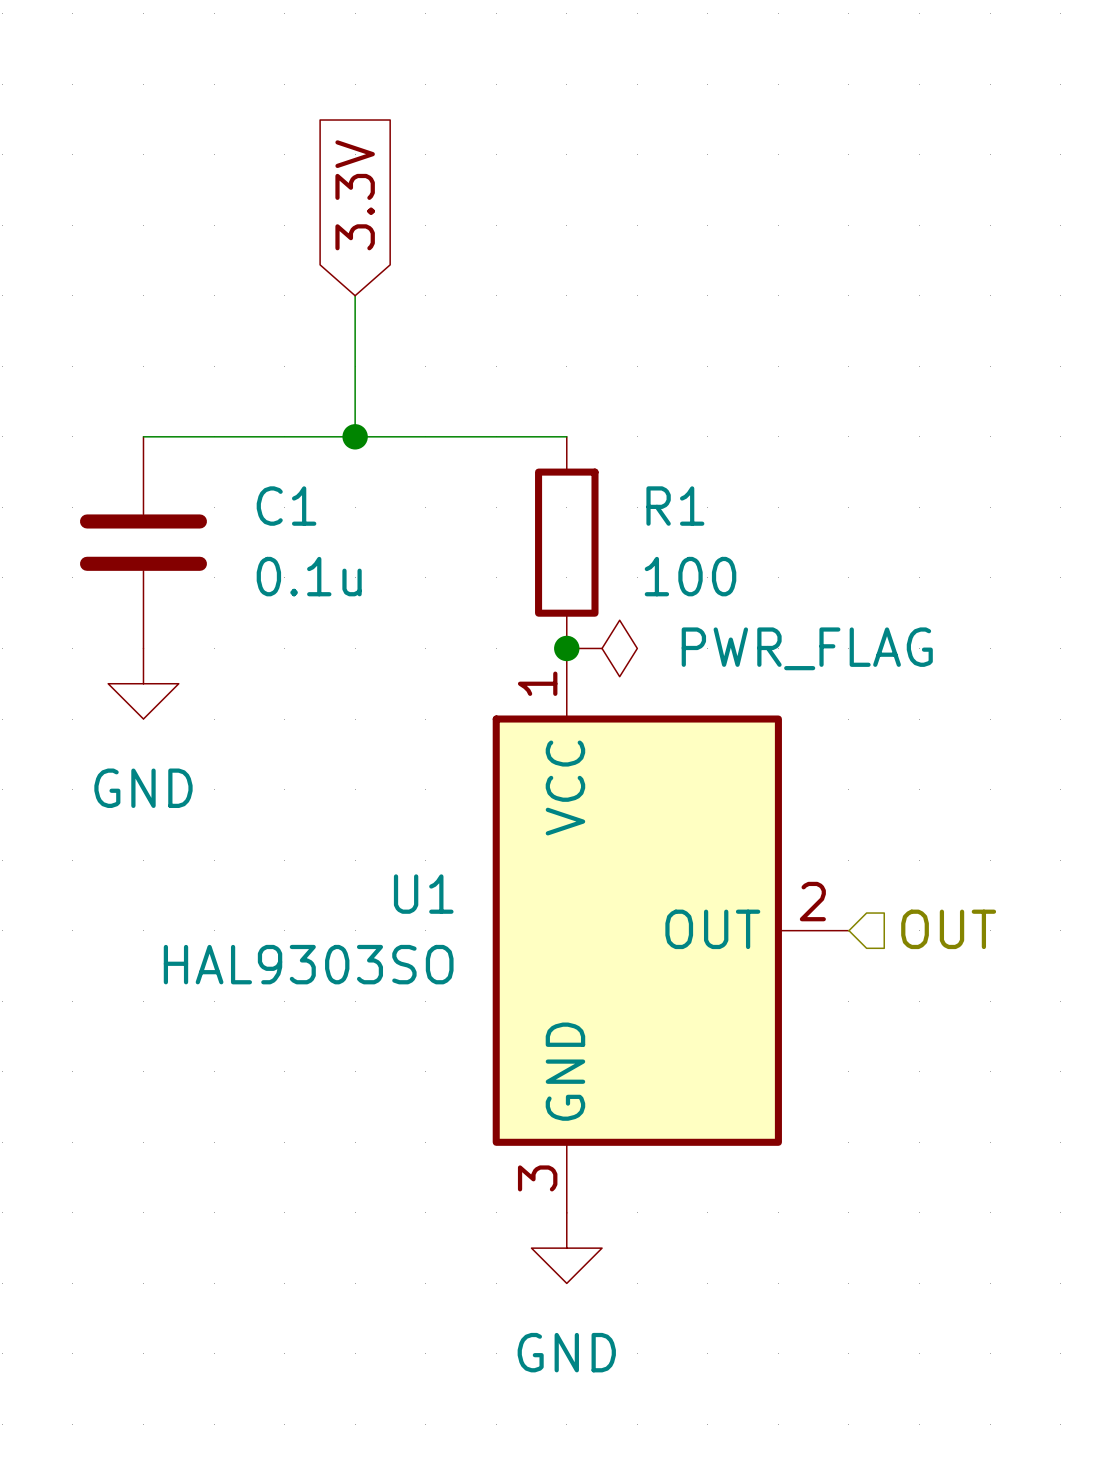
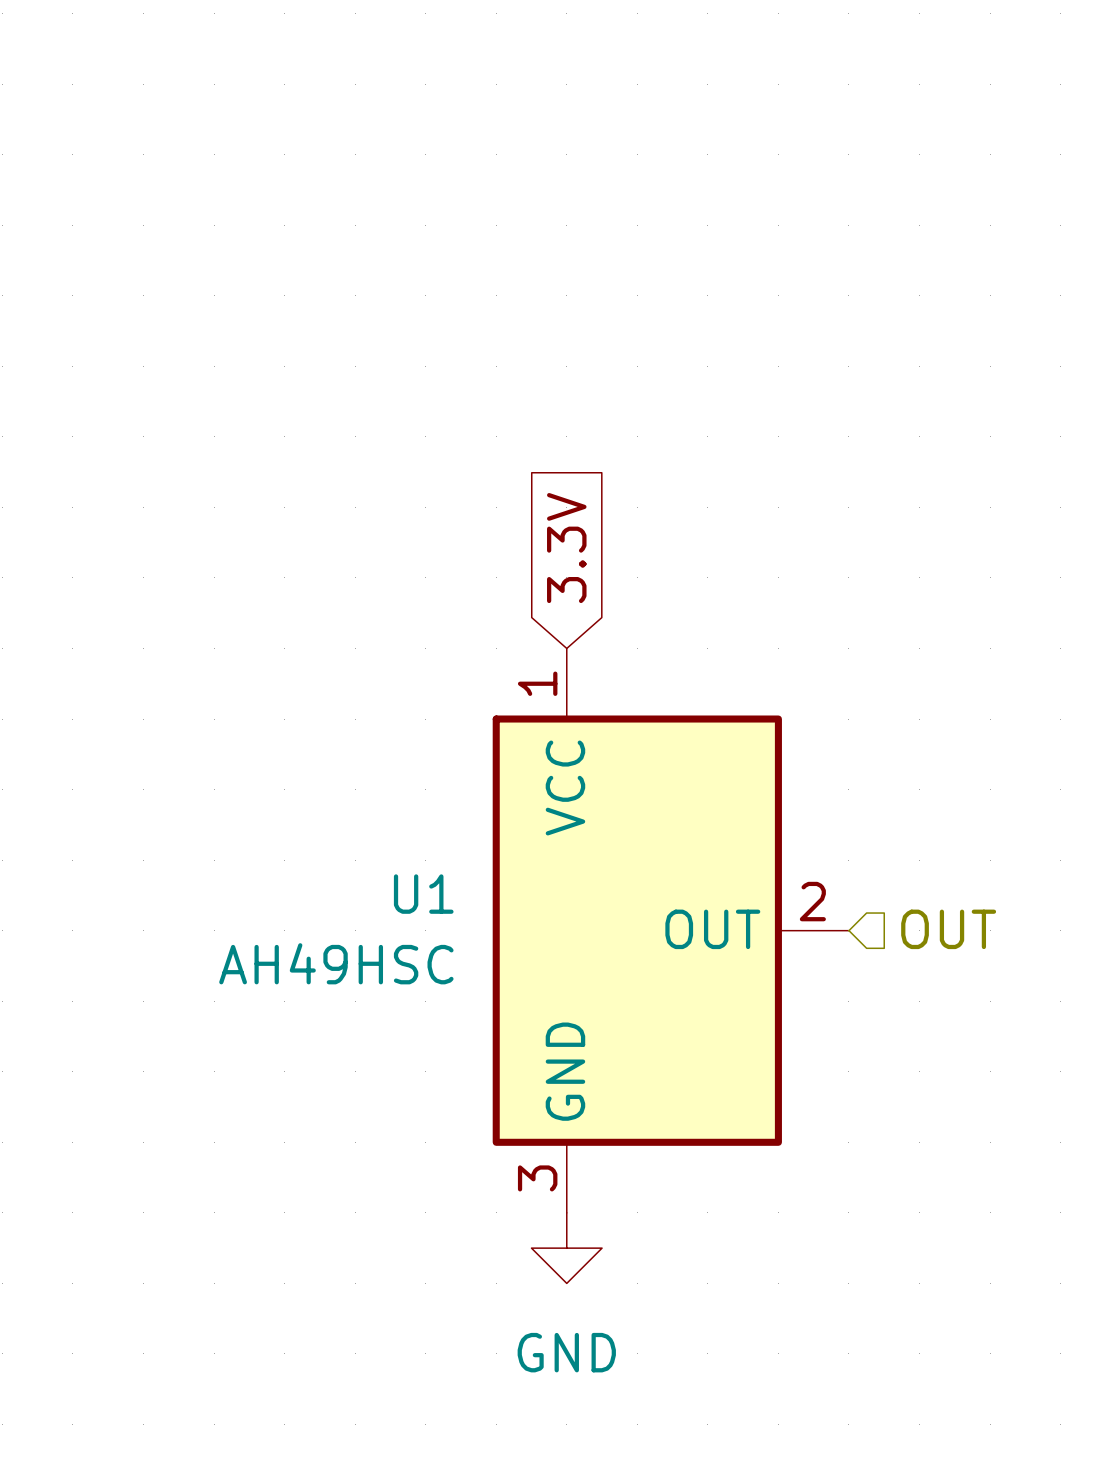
global label position: 3.3V (355, 195) -> 3.3V (566, 548)
wire: (355, 295) (355, 436) -> none
wire: (143, 436) (566, 436) -> none
junction: (355, 436) -> none
C1: 0.1u (143, 542) -> none
R1: 100 (566, 542) -> none
junction: (566, 648) -> none
power symbol: PWR_FLAG (602, 648) -> none
power symbol: GND (143, 683) -> none
U1 value: HAL9303SO (308, 964) -> AH49HSC (336, 963)

